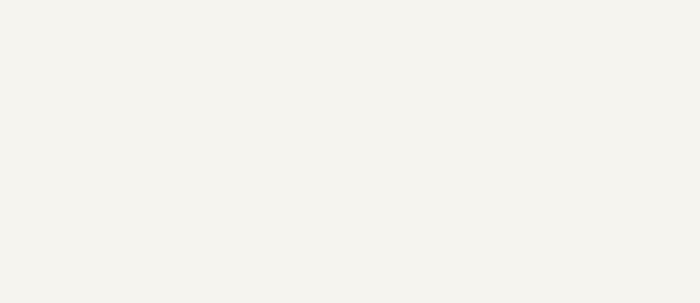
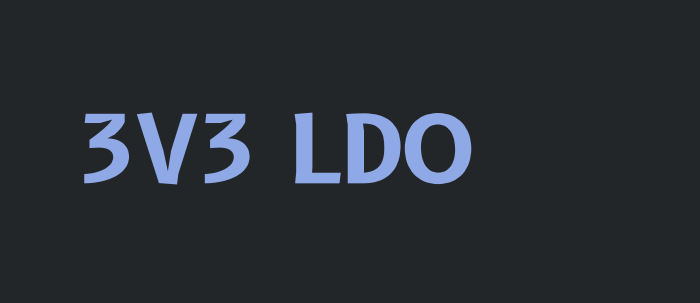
text: none -> 3V3 LDO (277, 148)

